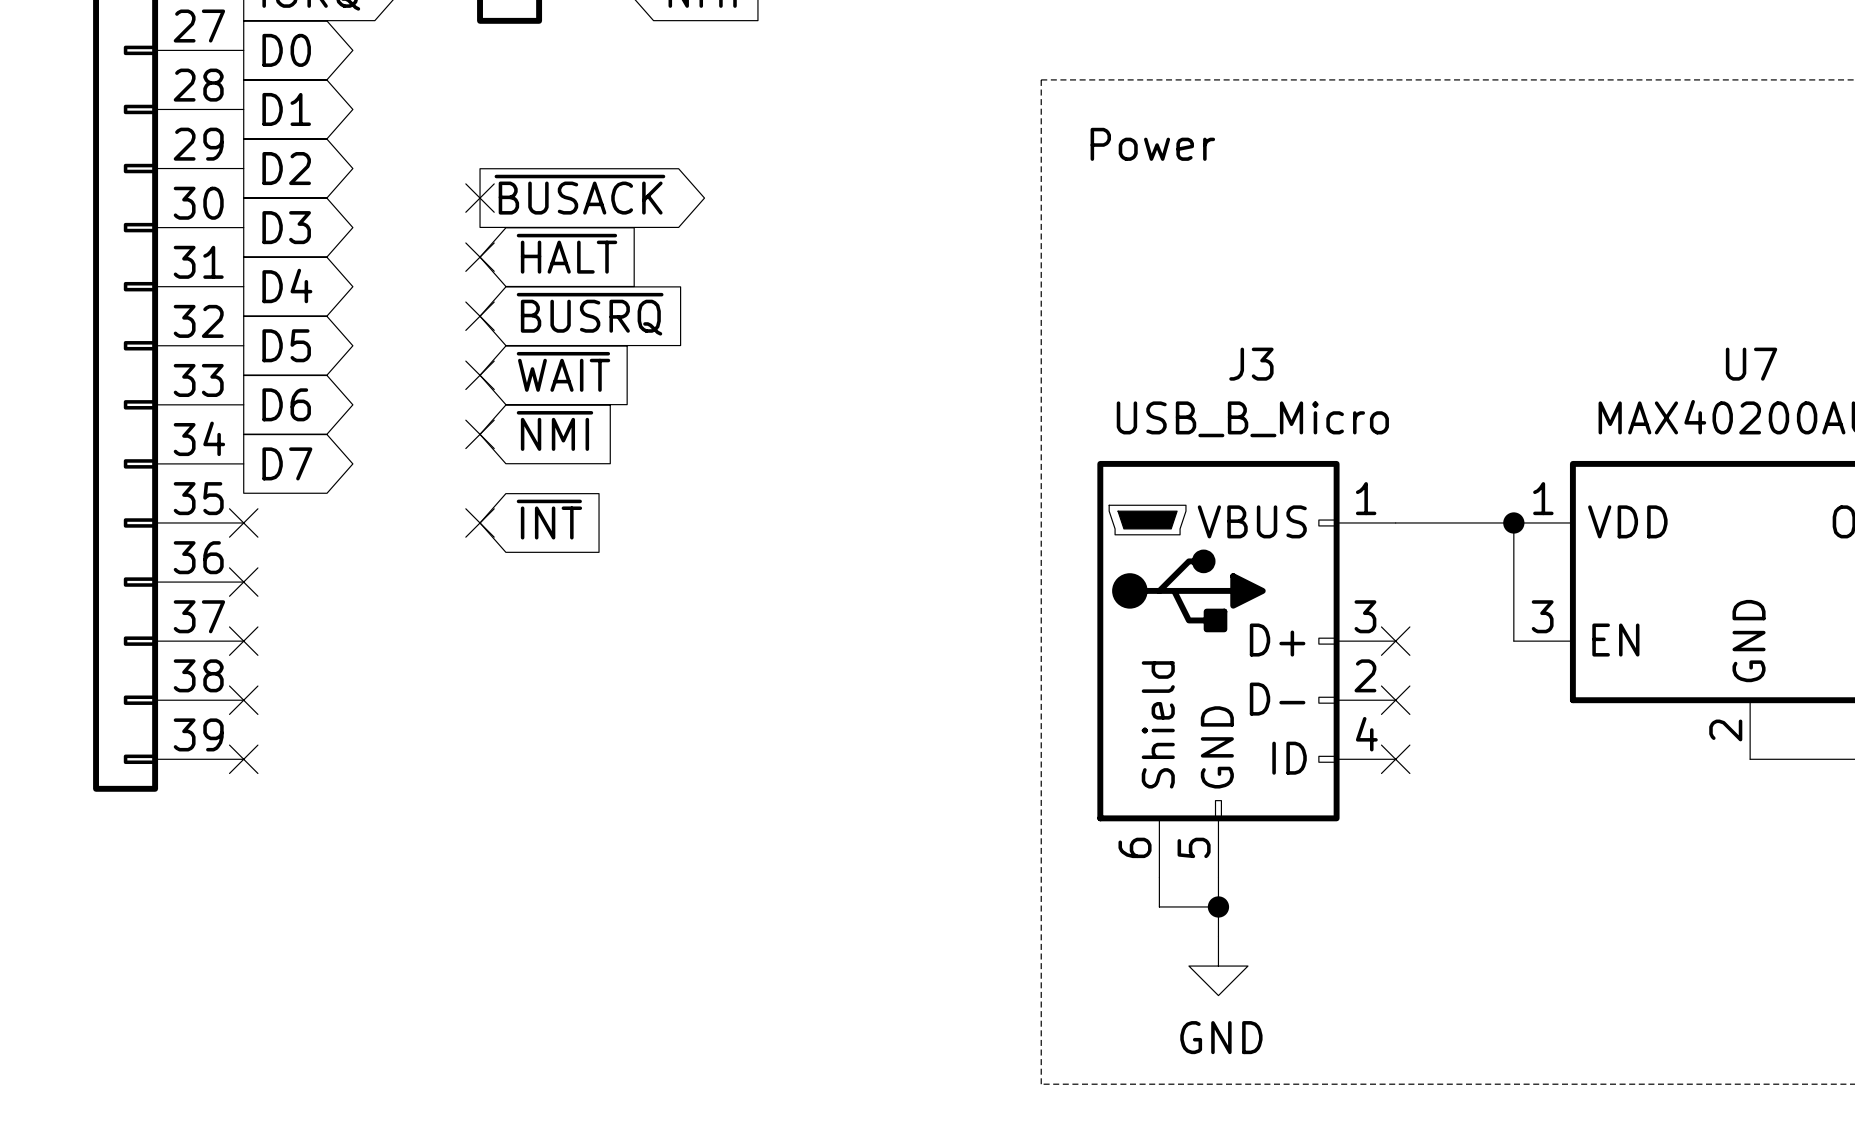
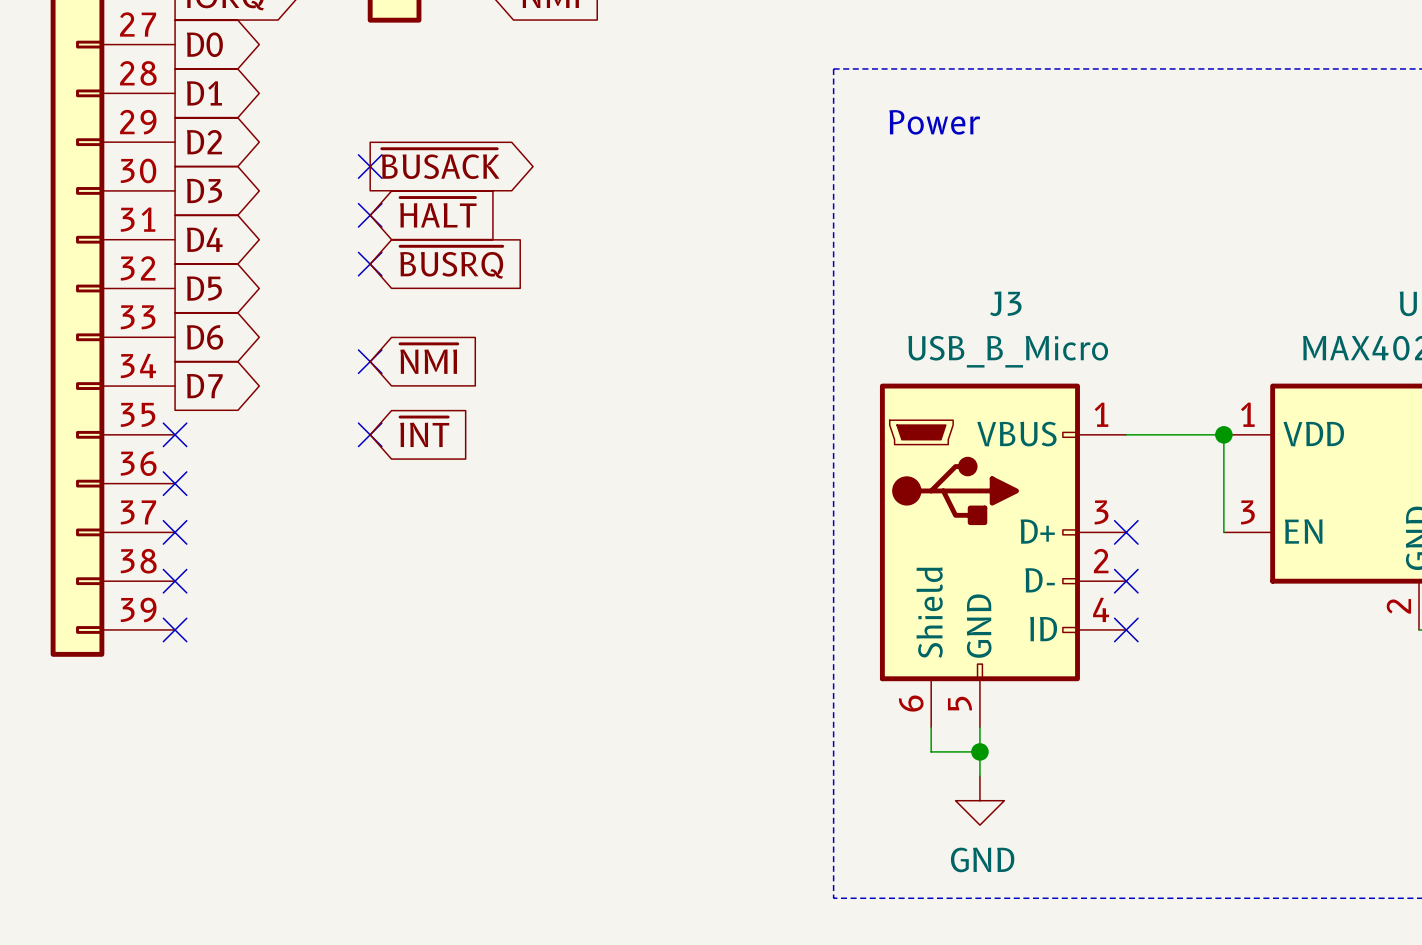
global label: ~{WAIT} (563, 371) -> none
no-connect mark: (480, 375) -> none

